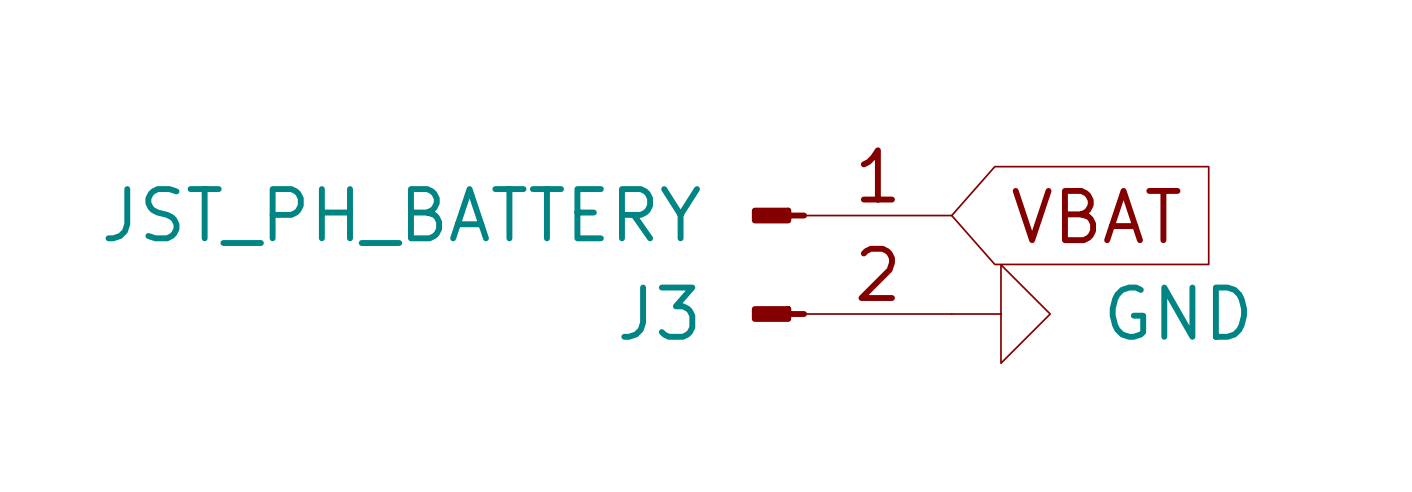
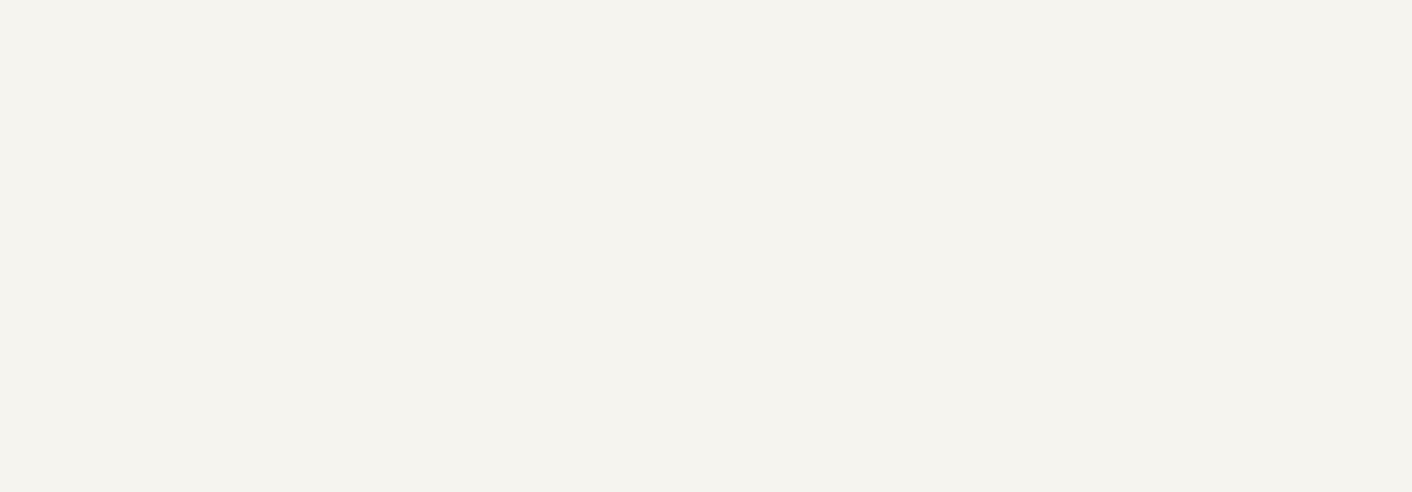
global label: VBAT (1096, 215) -> none
J3: JST_PH_BATTERY (851, 264) -> none
power symbol: GND (1000, 314) -> none

